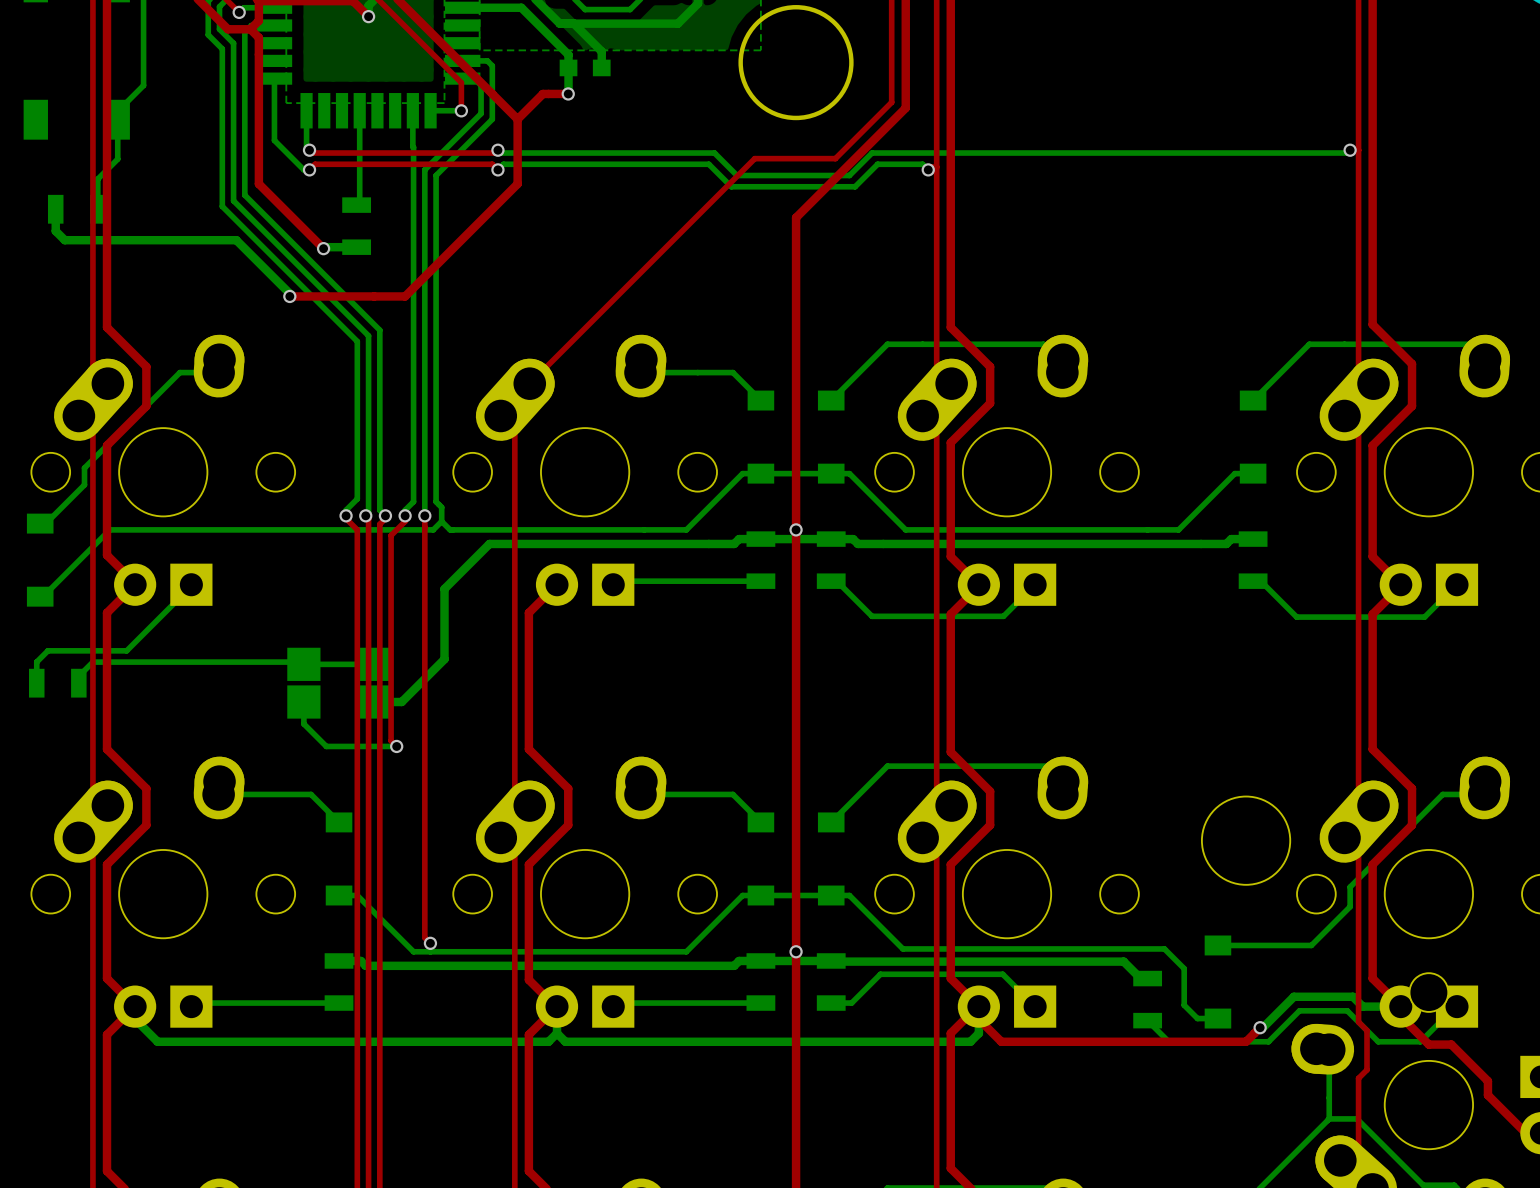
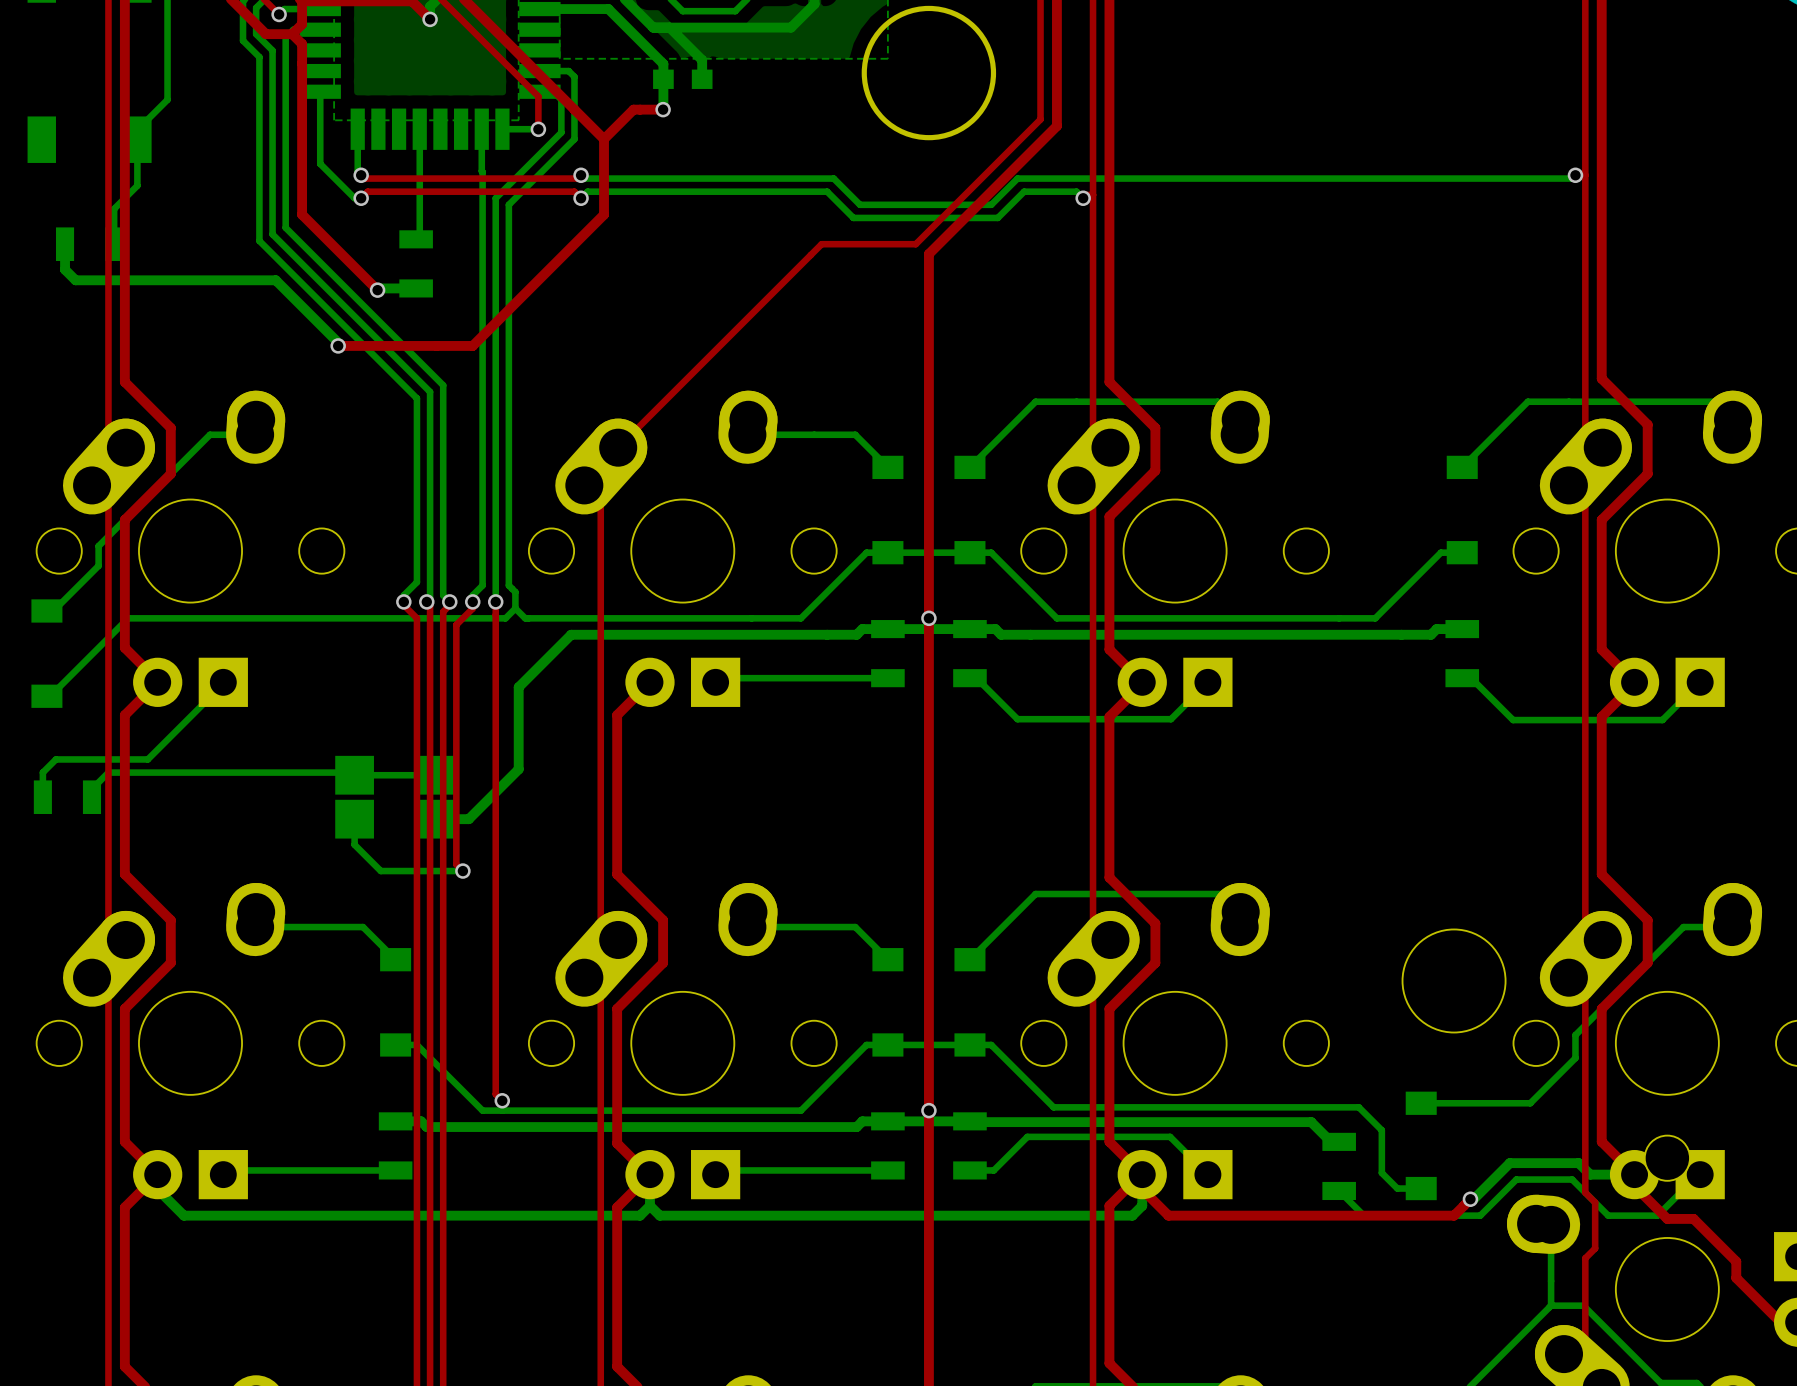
top track: (835, 158) (754, 158) (704, 209) -> (974, 185) (915, 244) (821, 244)

